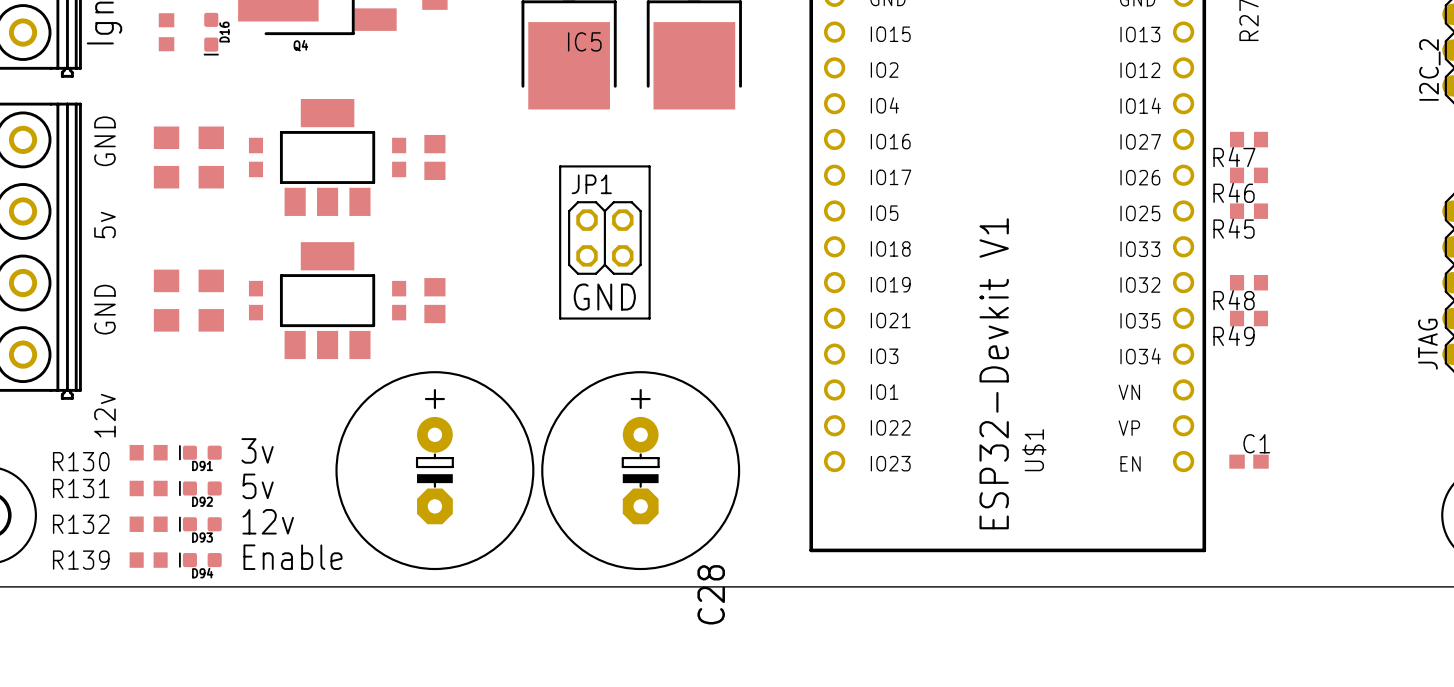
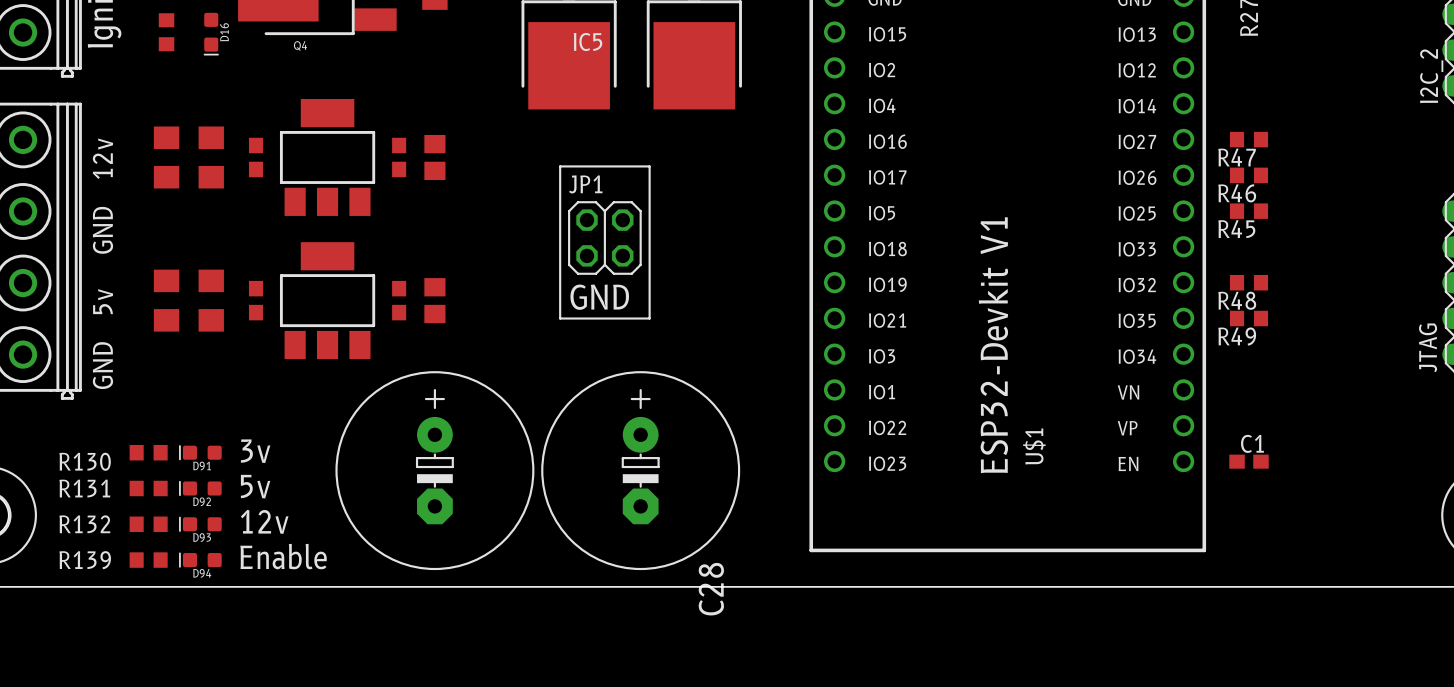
text: none -> GND 5v GND 12v (102, 263)
text: 12v GND 5v GND (104, 276) -> none

